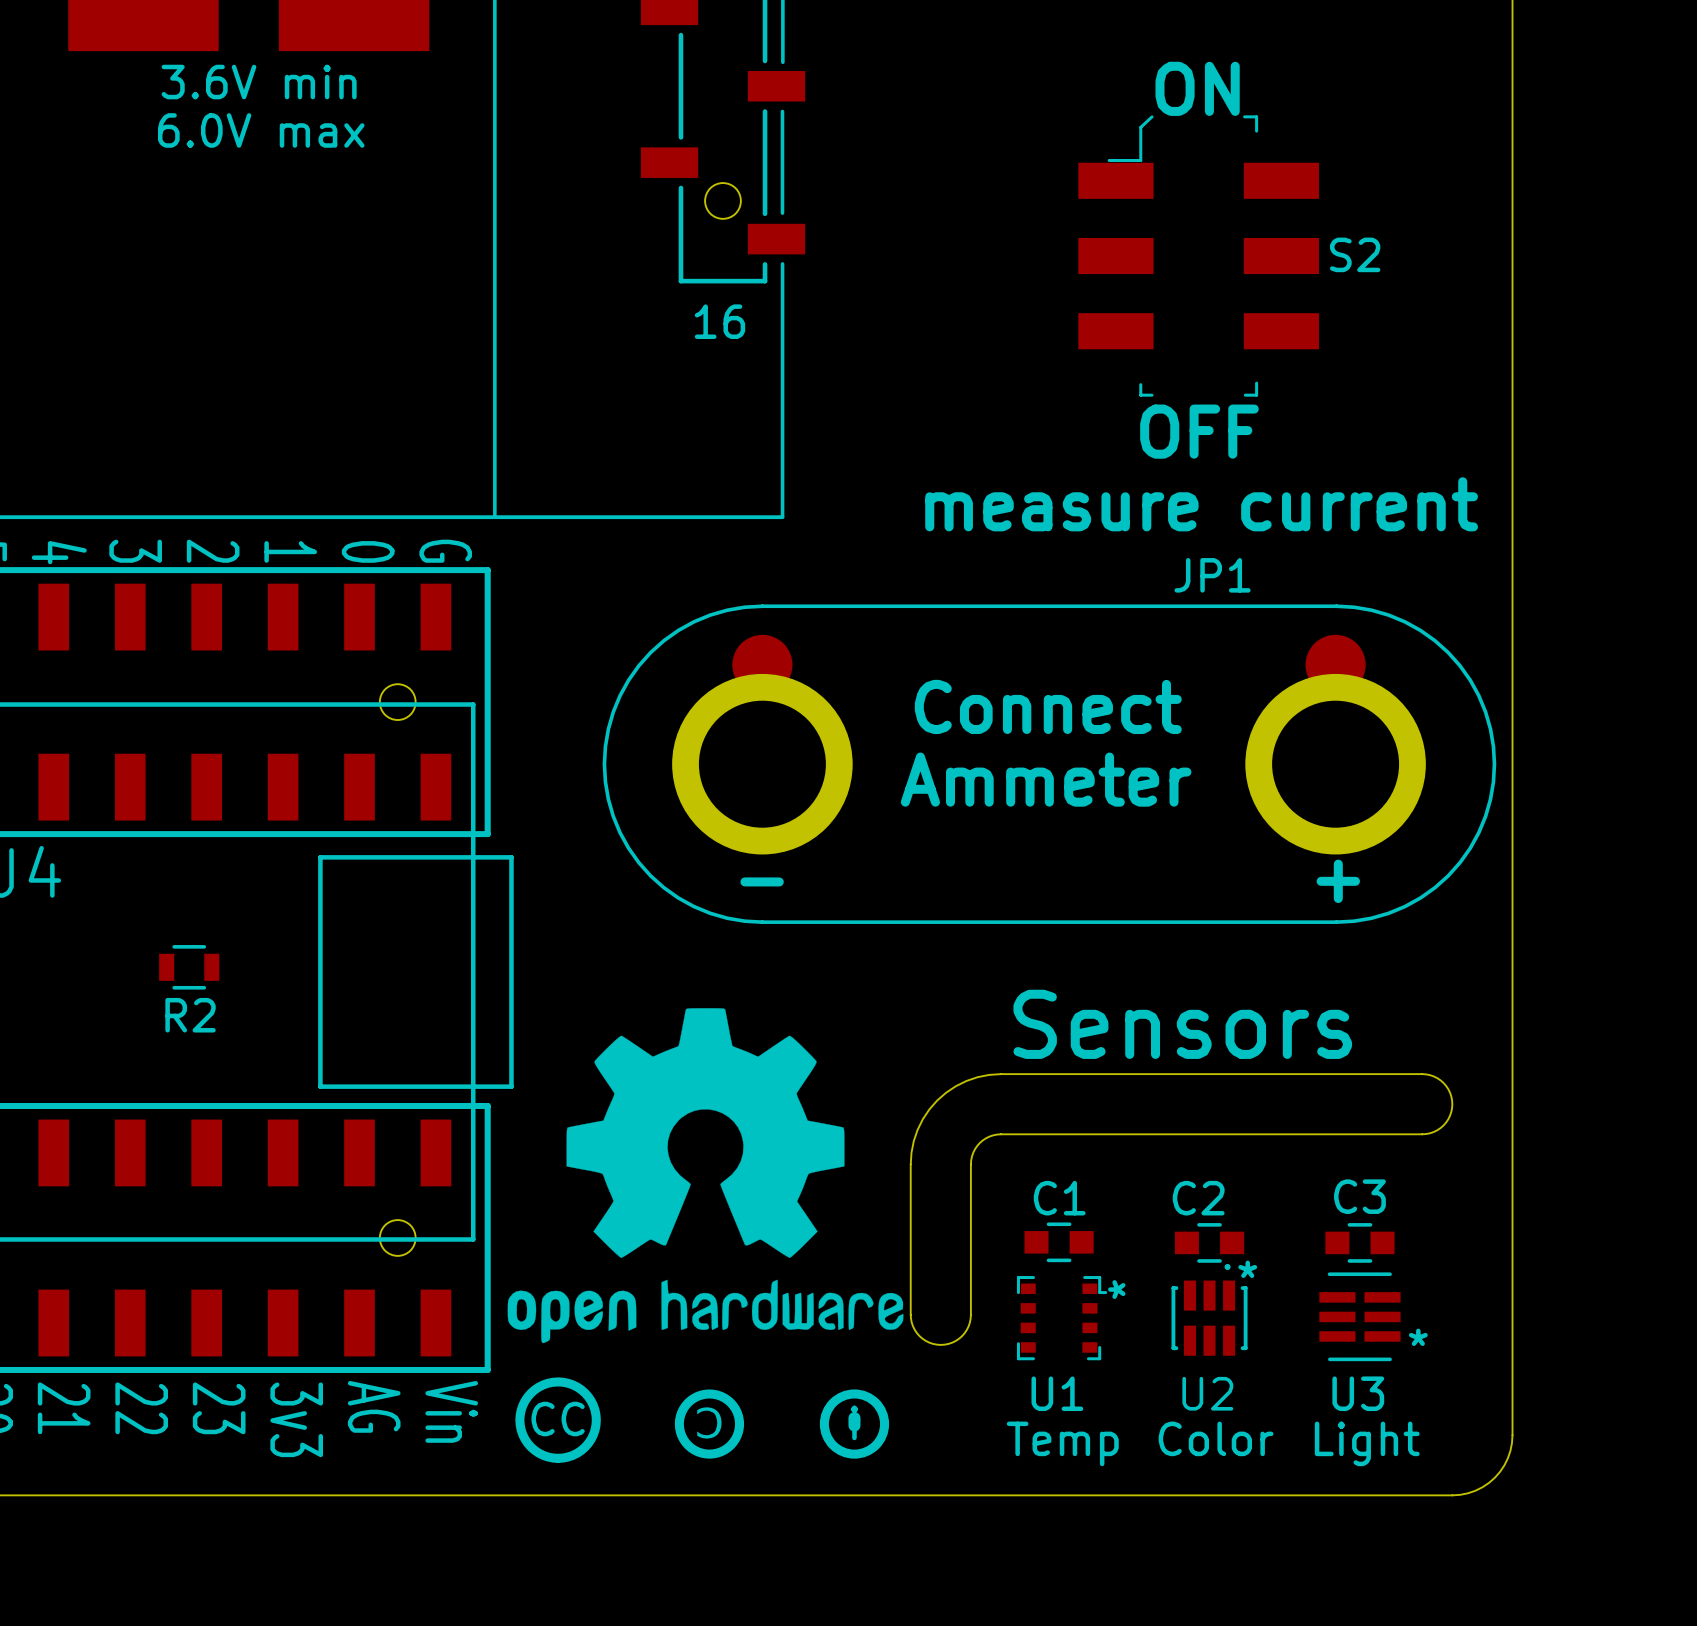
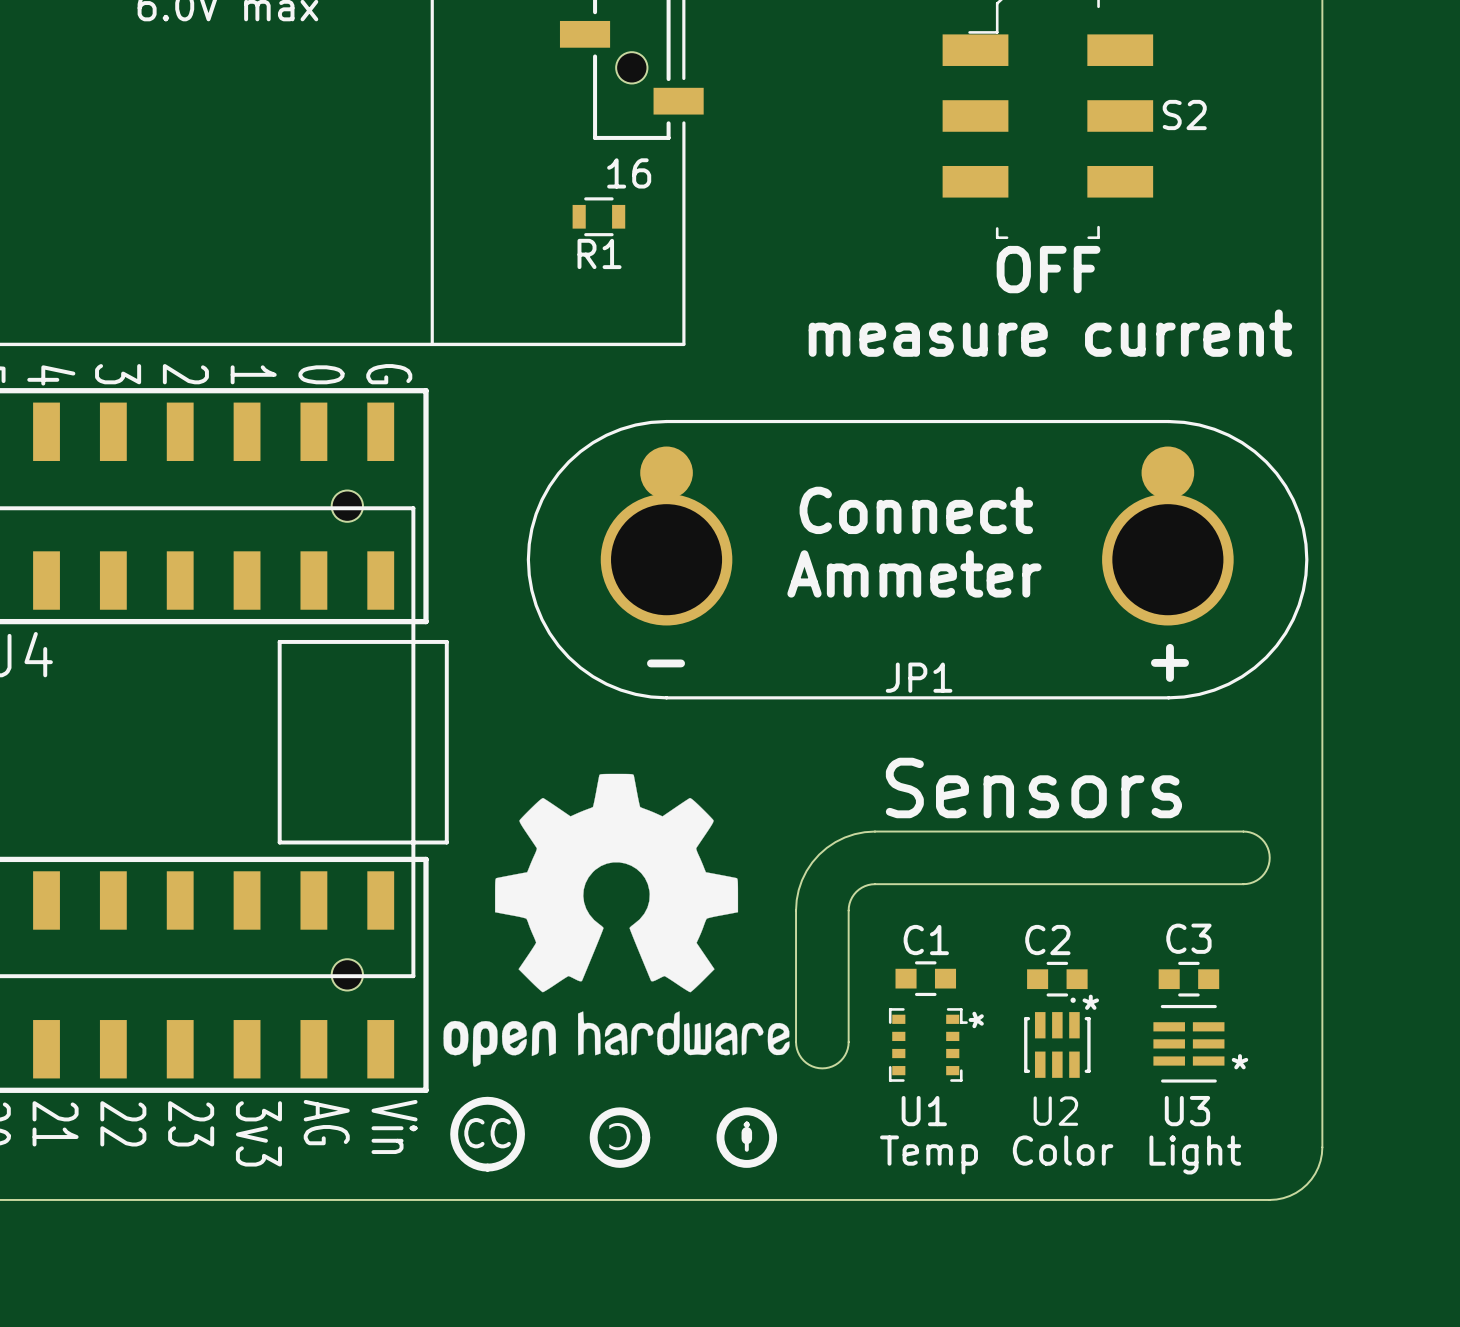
R1: none -> (598, 216)
JP1 name position: JP1 (1212, 575) -> JP1 (919, 677)
JP1 footprint: [602, 604, 1497, 924] -> [526, 419, 1309, 700]
R2: (189, 967) -> none

